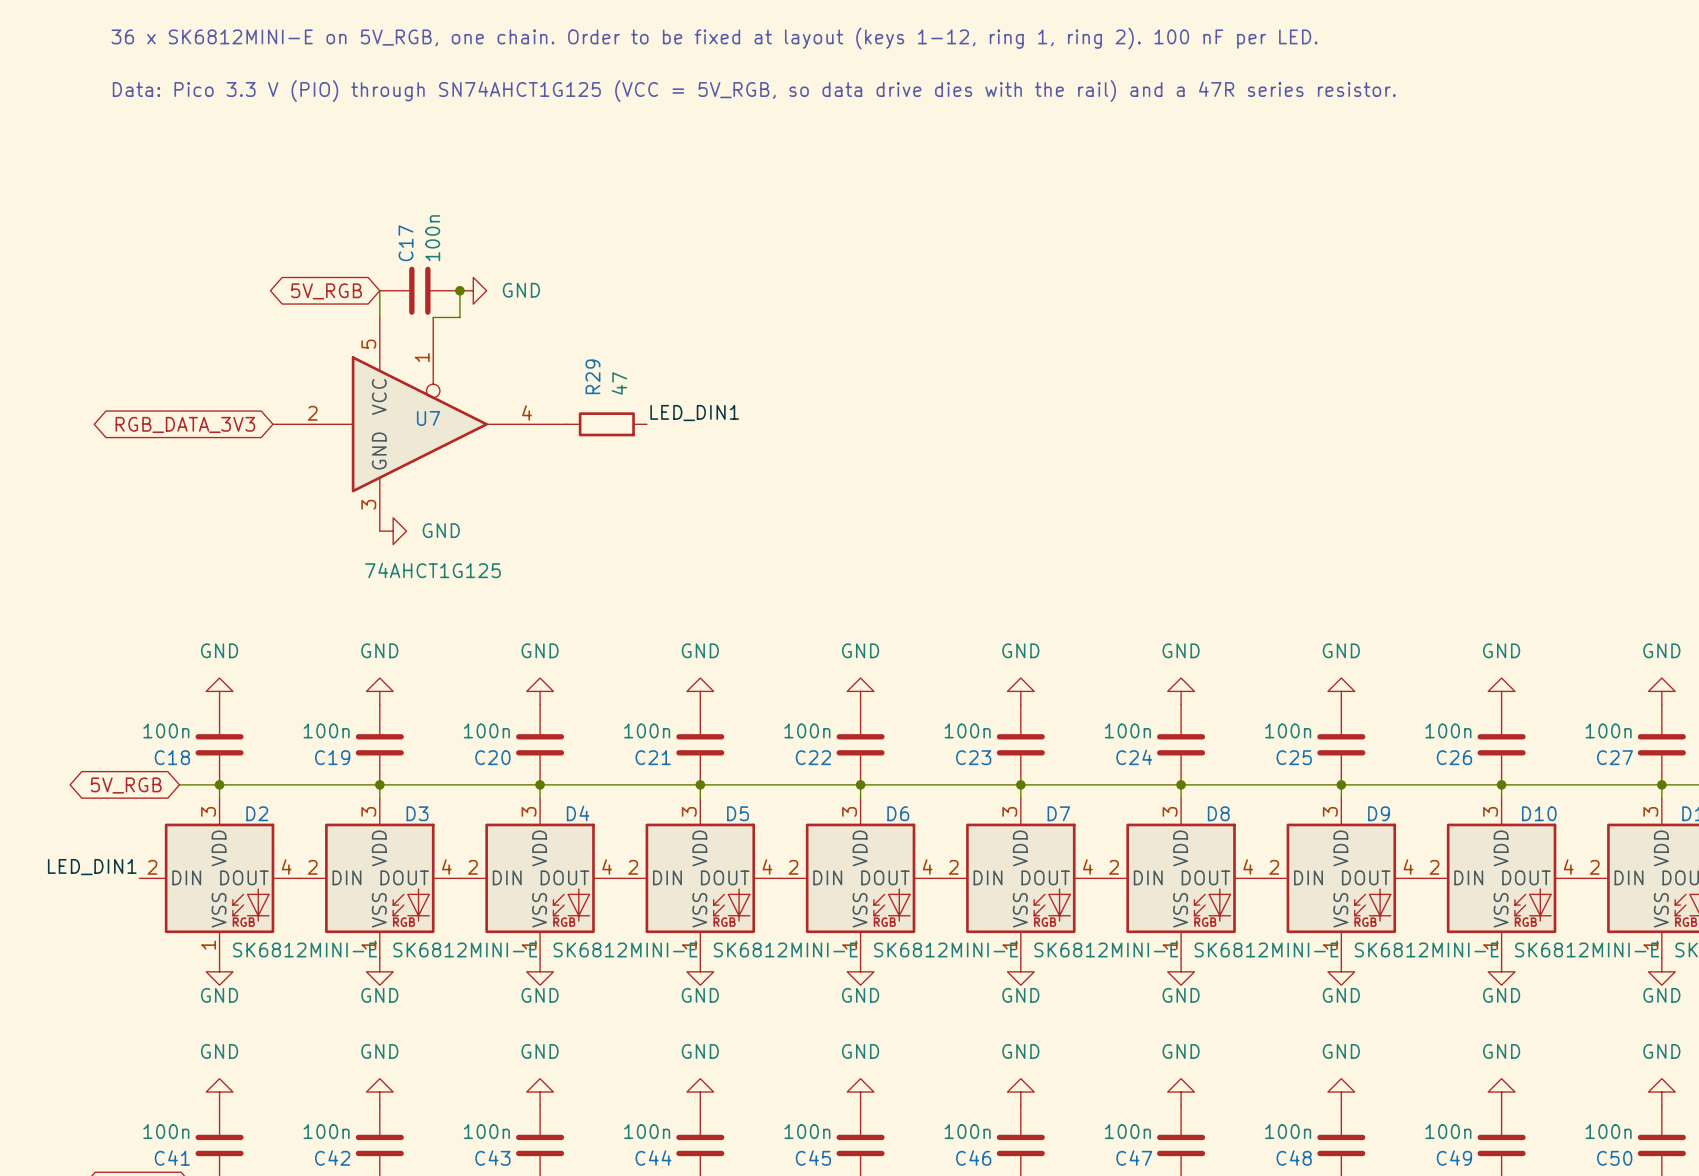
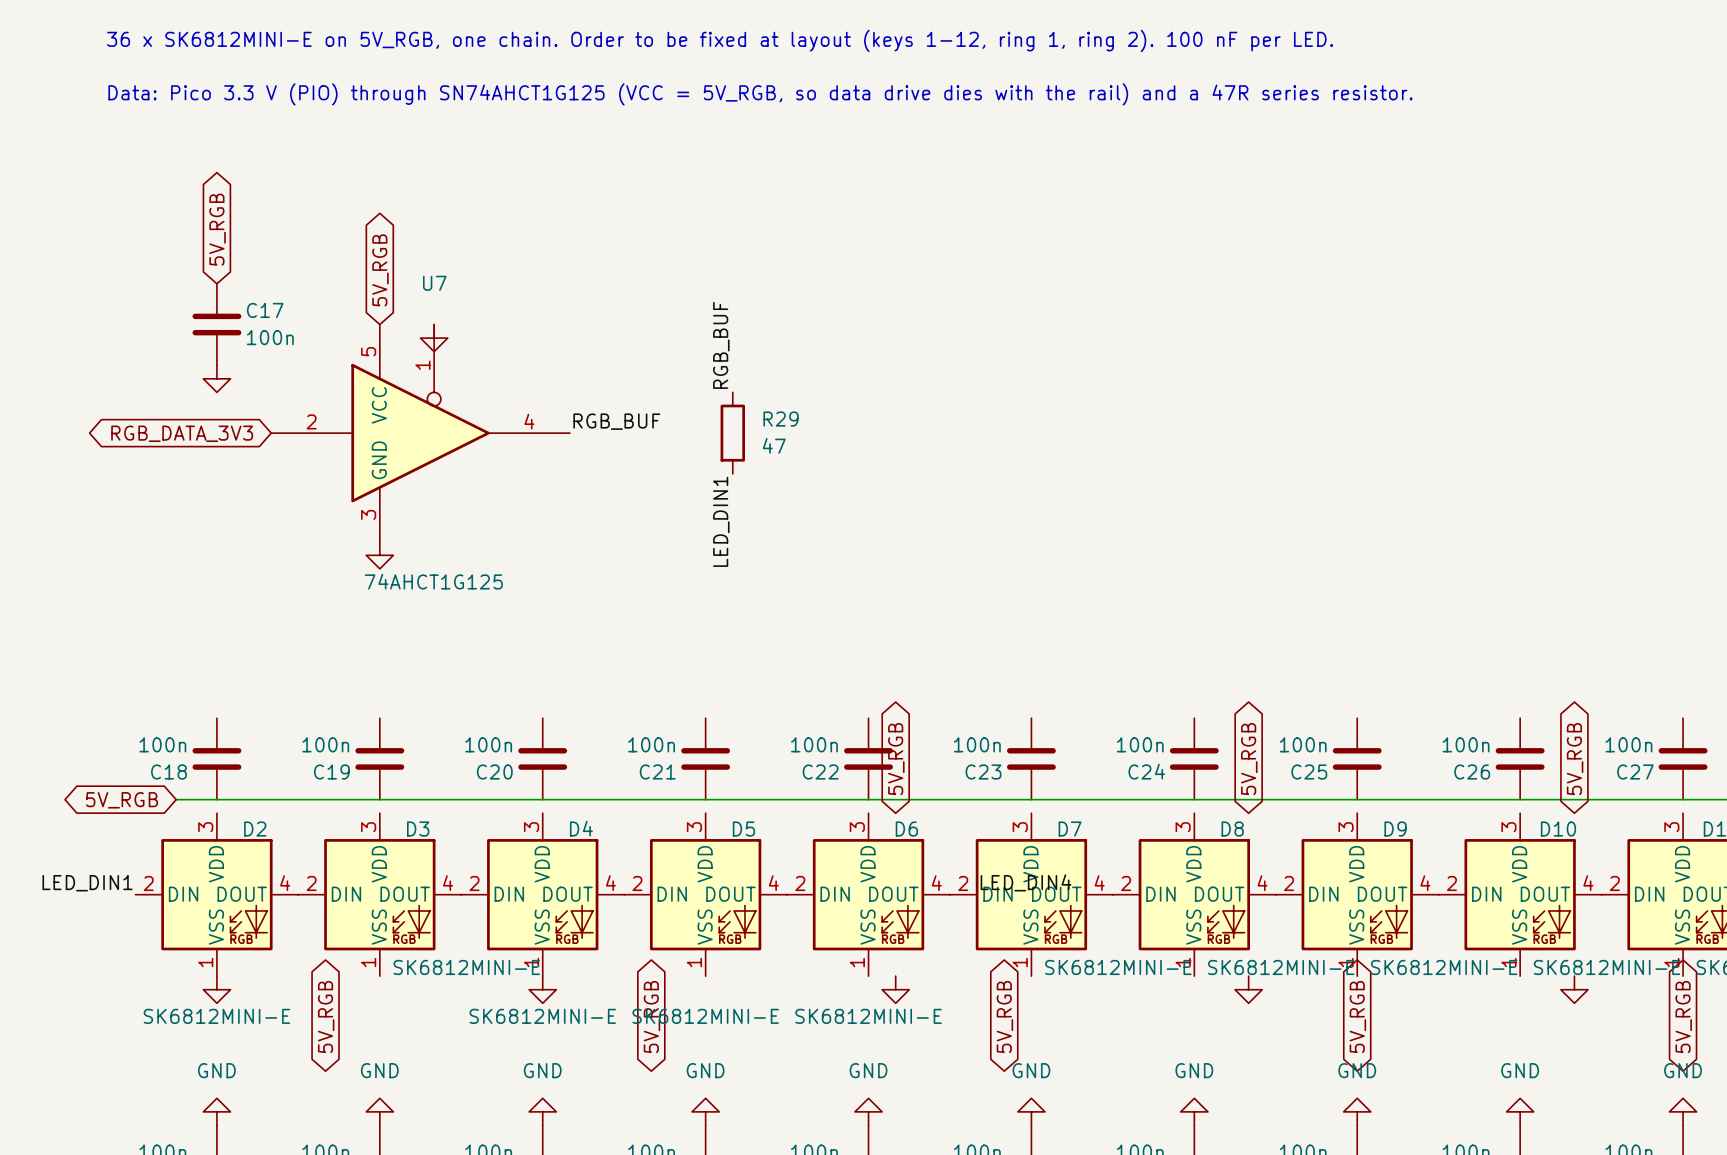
global label: none -> 5V_RGB (217, 229)
wire: (379, 290) (379, 317) -> none
C17 rotation: 0° (419, 290) -> 90° clockwise (216, 324)
C17 position: (419, 290) -> (216, 324)
wire: (459, 290) (459, 317) (433, 317) -> none
junction: (459, 290) -> none
power symbol: GND (473, 290) -> none
global label rotation: 0° (326, 291) -> 90° clockwise (380, 270)
power symbol: none -> (434, 338)
label: none -> RGB_BUF (721, 345)
power symbol: none -> (216, 378)
label: none -> RGB_BUF (616, 421)
label rotation: 0° (694, 413) -> 90° counterclockwise (721, 521)
U7 name position: U7 (428, 418) -> U7 (434, 283)
R29 rotation: 0° (606, 424) -> 90° clockwise (732, 433)
R29 position: (606, 424) -> (732, 433)
power symbol: GND (393, 531) -> none
power symbol: none -> (379, 555)
power symbol: GND (219, 691) -> none
power symbol: GND (379, 691) -> none
power symbol: GND (540, 691) -> none
power symbol: GND (700, 691) -> none
power symbol: GND (860, 691) -> none
power symbol: GND (1020, 691) -> none
power symbol: GND (1181, 691) -> none
power symbol: GND (1341, 691) -> none
power symbol: GND (1501, 691) -> none
power symbol: GND (1661, 691) -> none
global label: none -> 5V_RGB (896, 759)
global label: none -> 5V_RGB (1249, 759)
global label: none -> 5V_RGB (1575, 759)
wire: (219, 784) (219, 798) -> none
junction: (219, 784) -> none
wire: (379, 784) (379, 798) -> none
junction: (379, 784) -> none
wire: (540, 784) (540, 798) -> none
junction: (540, 784) -> none
wire: (700, 784) (700, 798) -> none
junction: (700, 784) -> none
wire: (860, 784) (860, 798) -> none
junction: (860, 784) -> none
wire: (1020, 784) (1020, 798) -> none
junction: (1020, 784) -> none
wire: (1181, 784) (1181, 798) -> none
junction: (1181, 784) -> none
wire: (1341, 784) (1341, 798) -> none
junction: (1341, 784) -> none
wire: (1501, 784) (1501, 798) -> none
junction: (1501, 784) -> none
wire: (1661, 784) (1661, 798) -> none
junction: (1661, 784) -> none
label: none -> LED_DIN4 (1026, 882)
D2 value position: SK6812MINI-E (305, 949) -> SK6812MINI-E (216, 1016)
D4 value position: SK6812MINI-E (625, 949) -> SK6812MINI-E (542, 1016)
D5 value position: SK6812MINI-E (785, 949) -> SK6812MINI-E (705, 1016)
D6 value position: SK6812MINI-E (946, 949) -> SK6812MINI-E (868, 1016)
power symbol: GND (379, 971) -> none
power symbol: GND (700, 971) -> none
power symbol: GND (860, 971) -> none
power symbol: none -> (895, 989)
power symbol: GND (1020, 971) -> none
power symbol: GND (1181, 971) -> none
power symbol: none -> (1248, 989)
power symbol: GND (1341, 971) -> none
power symbol: GND (1501, 971) -> none
power symbol: none -> (1574, 989)
power symbol: GND (1661, 971) -> none
power symbol text: GND (219, 995) -> none
power symbol text: GND (540, 995) -> none
global label: none -> 5V_RGB (326, 1017)
global label: none -> 5V_RGB (651, 1017)
global label: none -> 5V_RGB (1004, 1017)
global label: none -> 5V_RGB (1357, 1017)
global label: none -> 5V_RGB (1683, 1017)

